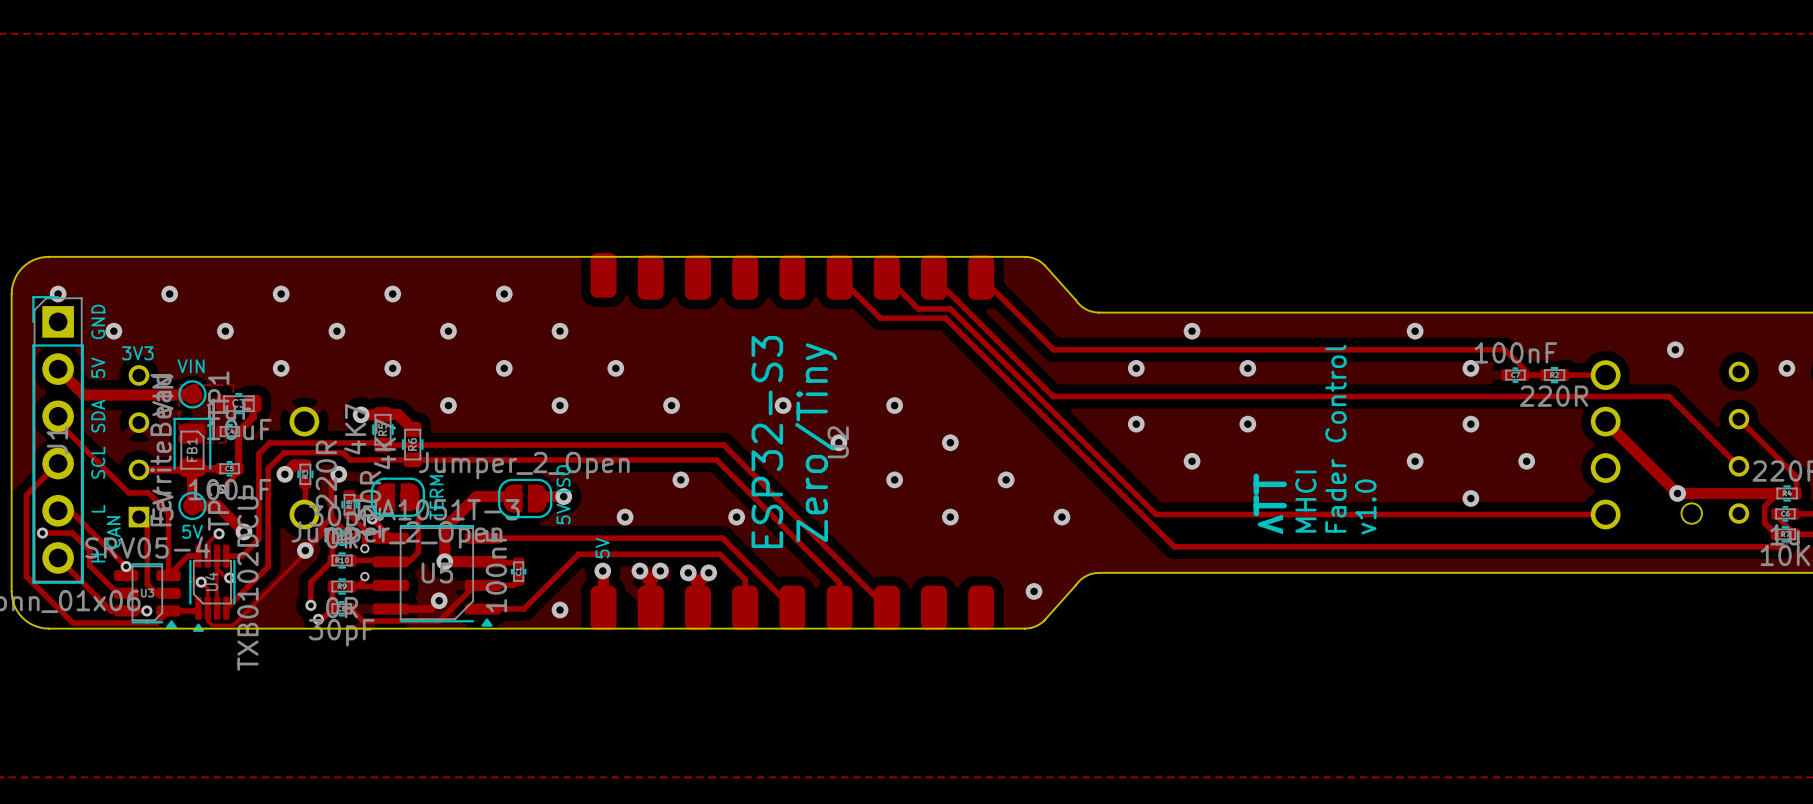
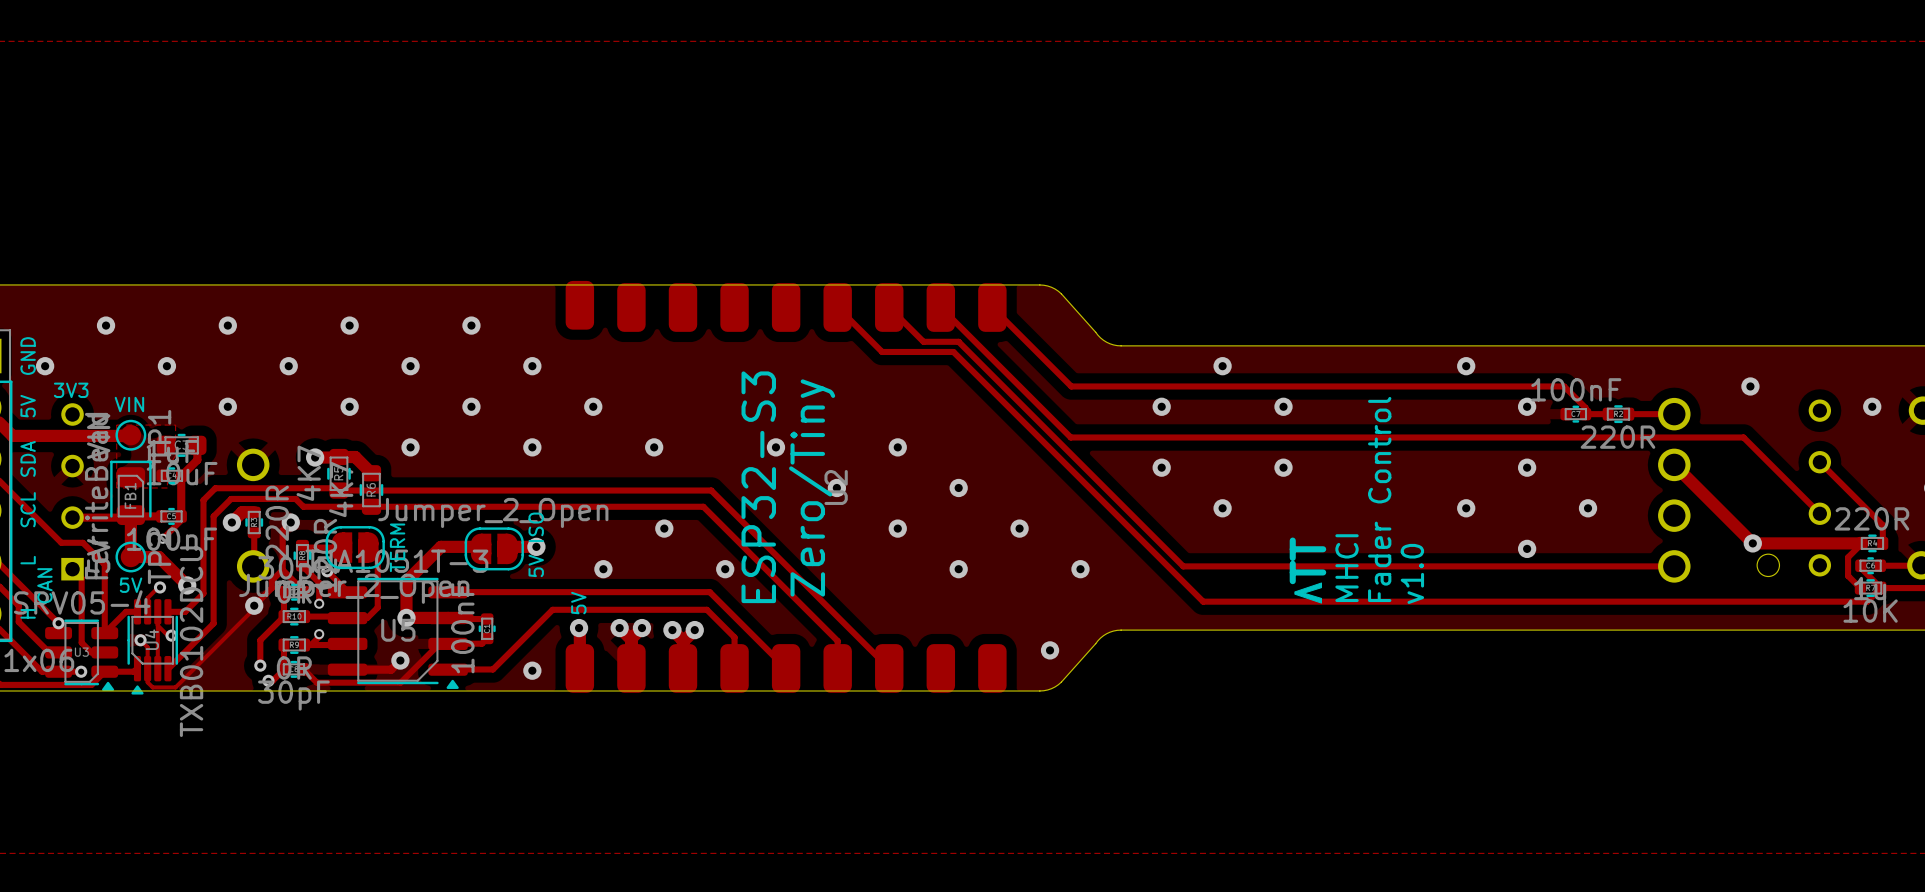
text position: Fader Control (1335, 438) -> Fader Control (1379, 499)
text position: TT (1270, 494) -> TT (1307, 560)
text position: MHCI (1305, 501) -> MHCI (1347, 568)
text position: v1.0 (1365, 506) -> v1.0 (1412, 573)
drawing position: (1270, 524) -> (1308, 593)

